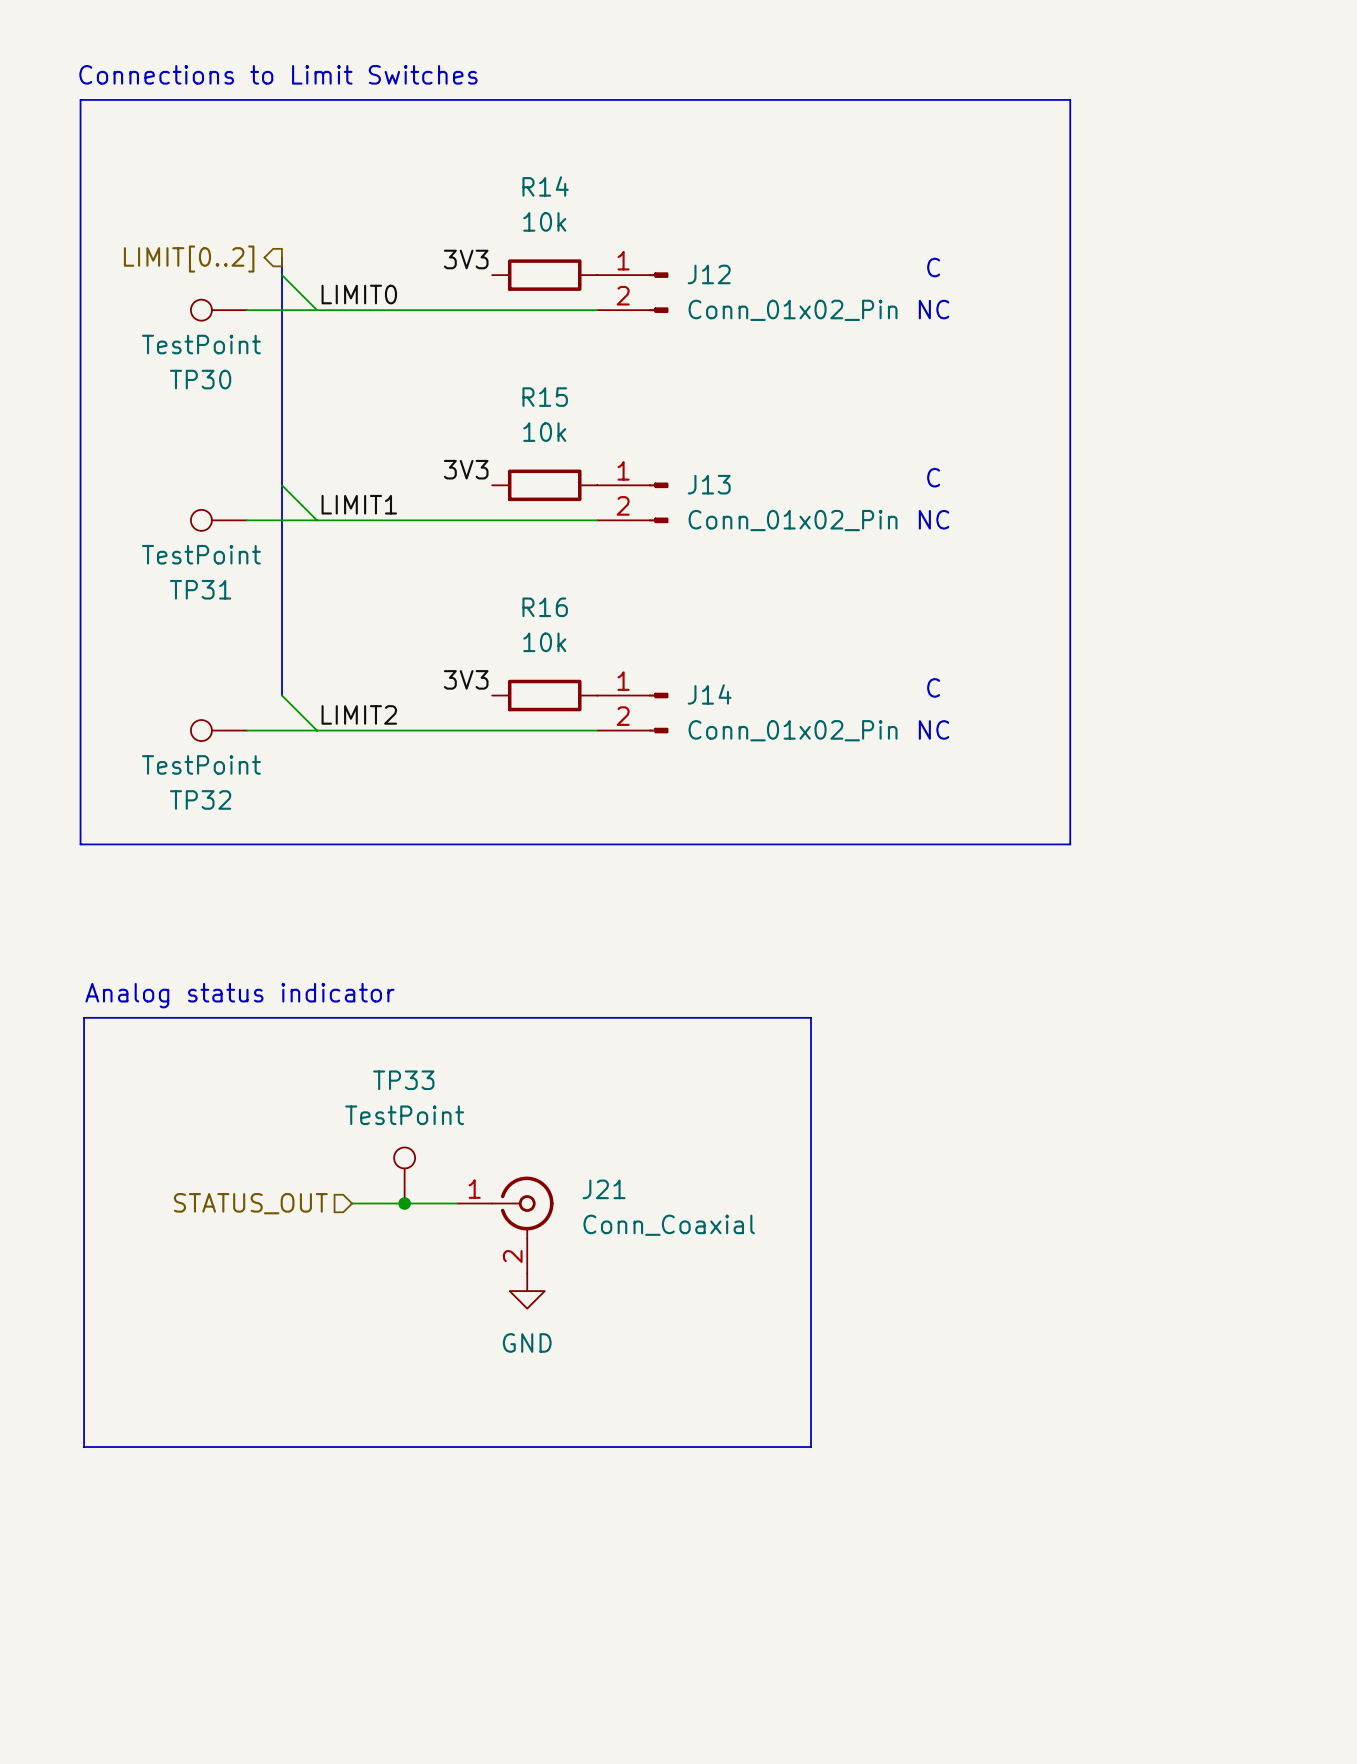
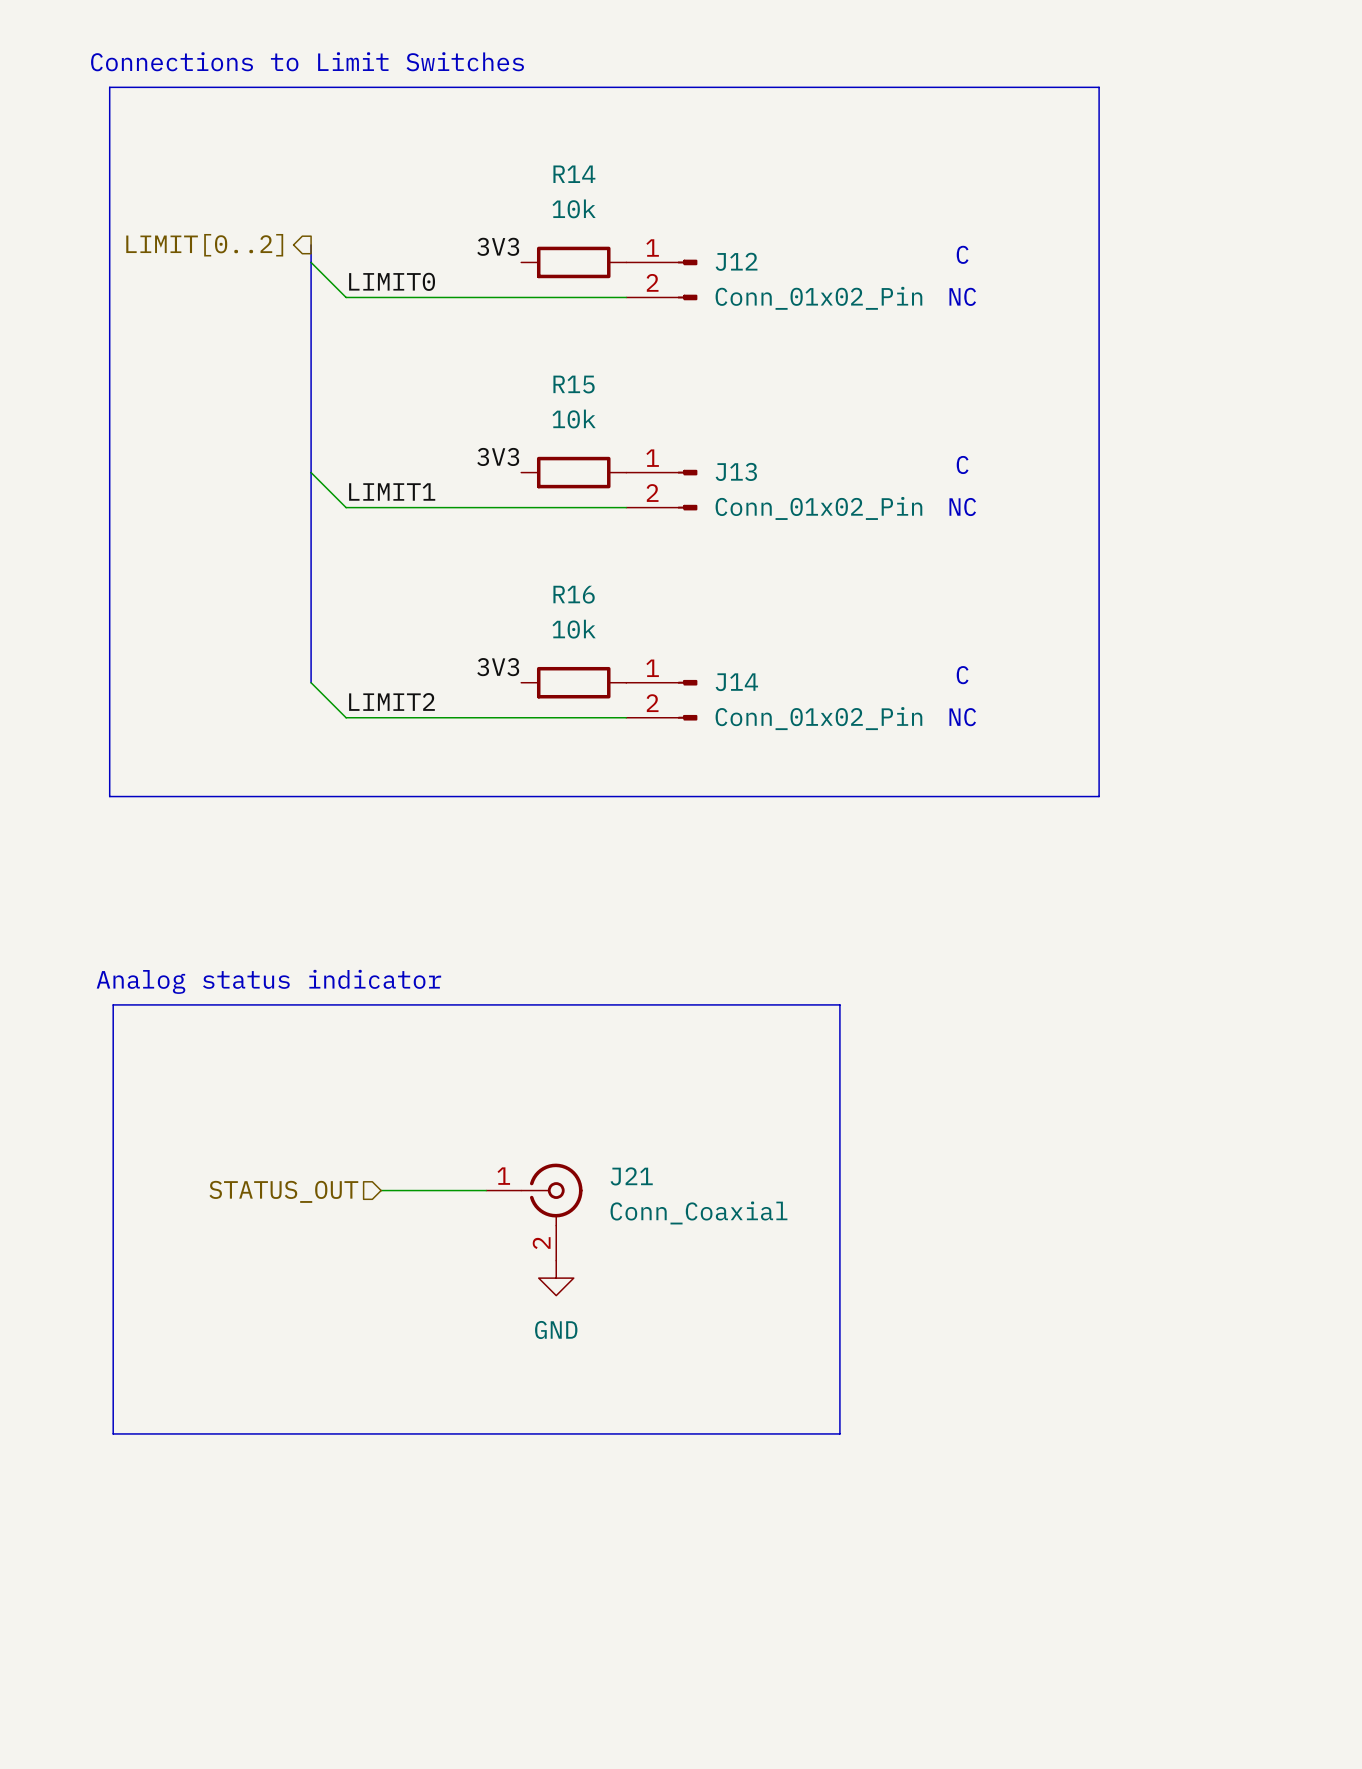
TP30: TestPoint (218, 310) -> none
wire: (246, 310) (317, 310) -> none
TP31: TestPoint (218, 520) -> none
wire: (246, 520) (317, 520) -> none
TP32: TestPoint (218, 730) -> none
wire: (246, 730) (317, 730) -> none
line: (80, 809) (80, 844) (1070, 844) (1070, 809) -> (109, 796) (1099, 796)
TP33: TestPoint (404, 1175) -> none
junction: (404, 1203) -> none

